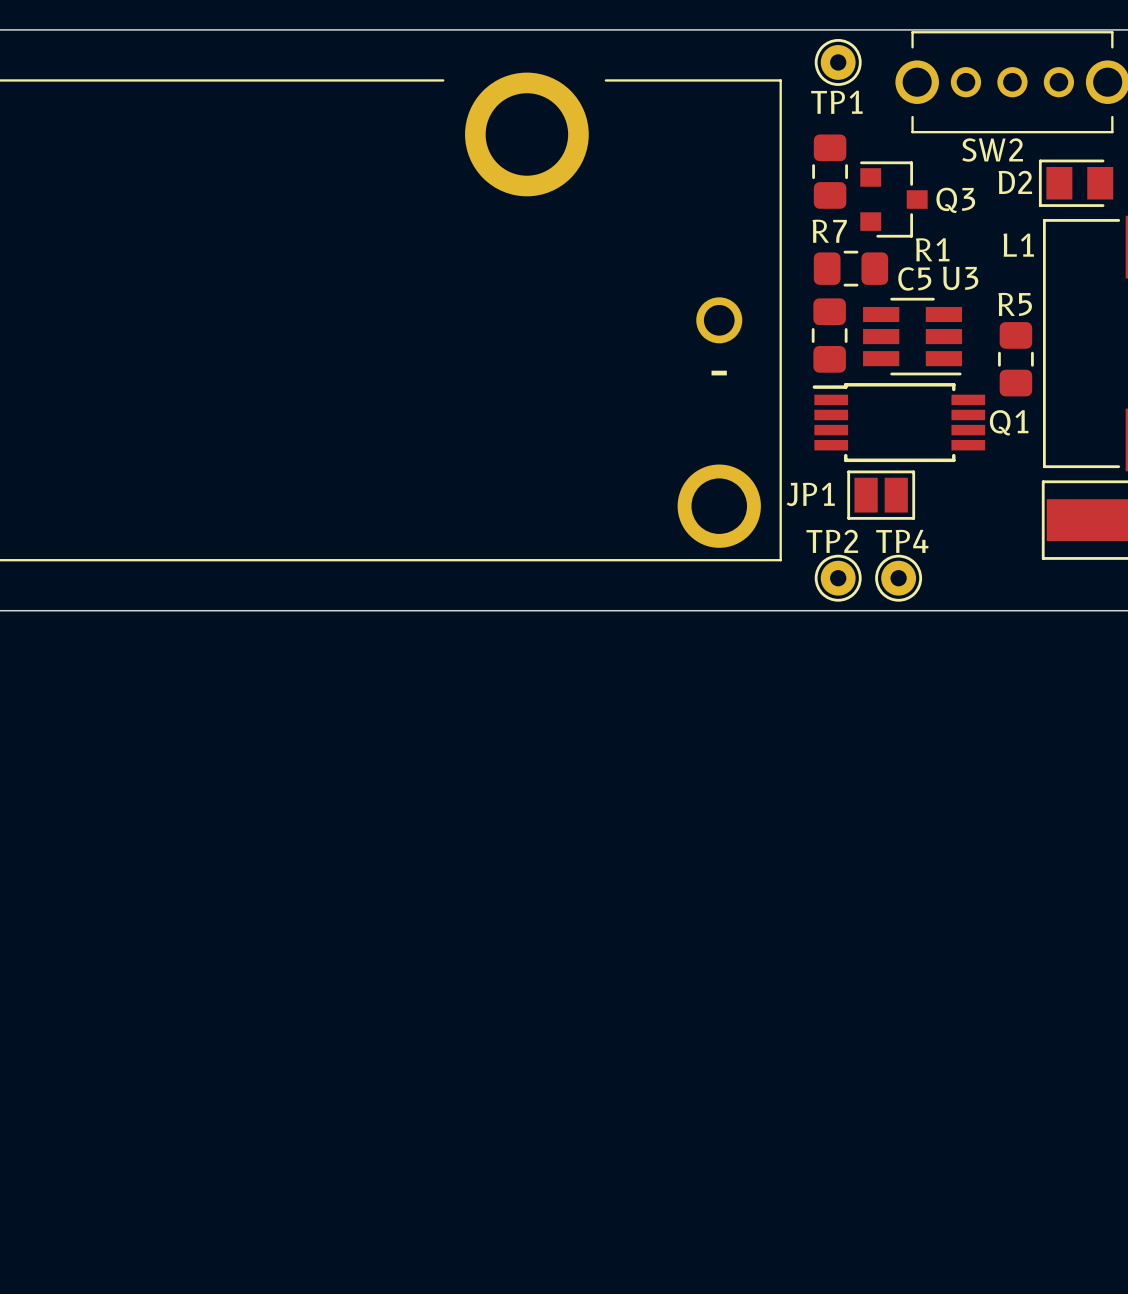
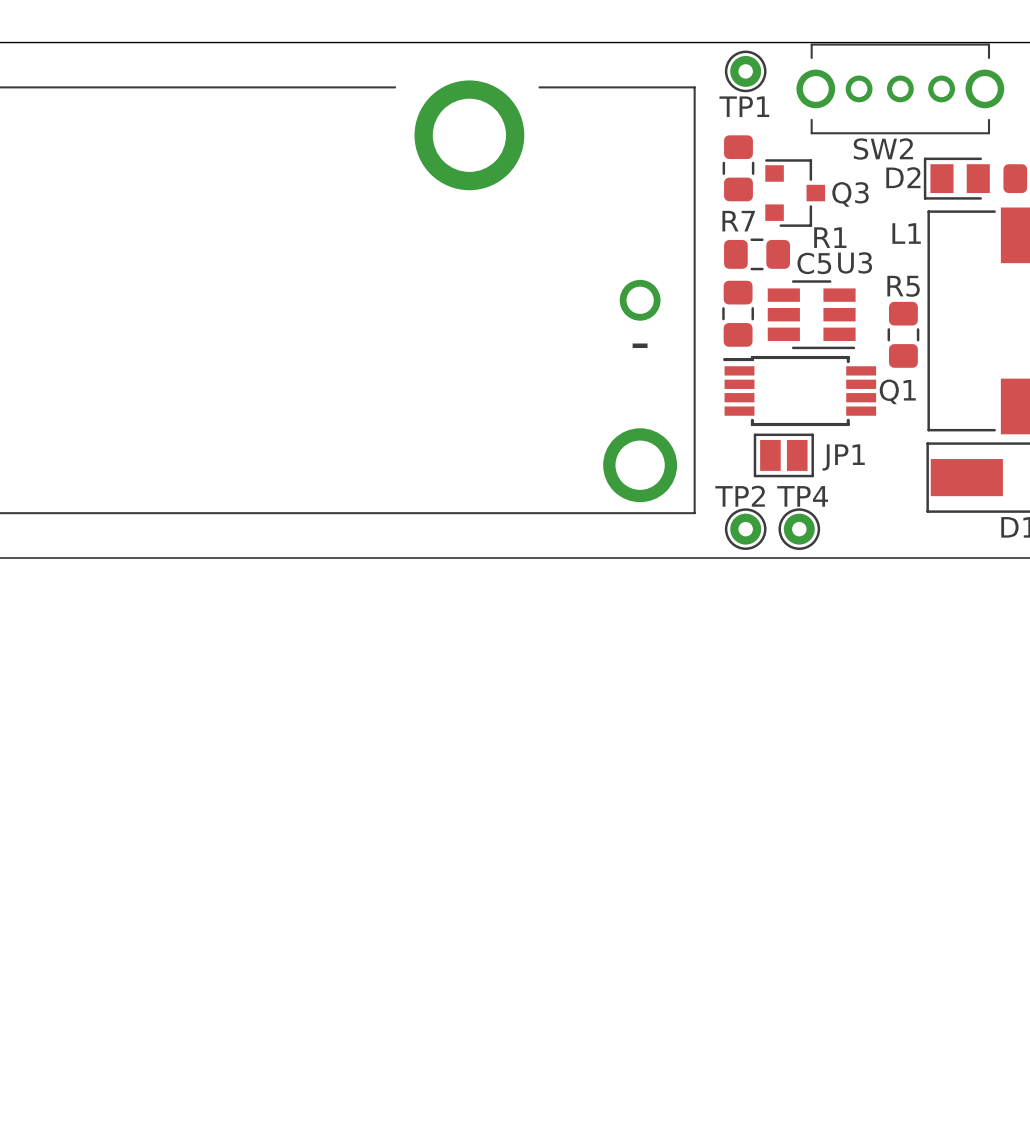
JP1 name position: JP1 (810, 494) -> JP1 (843, 457)

